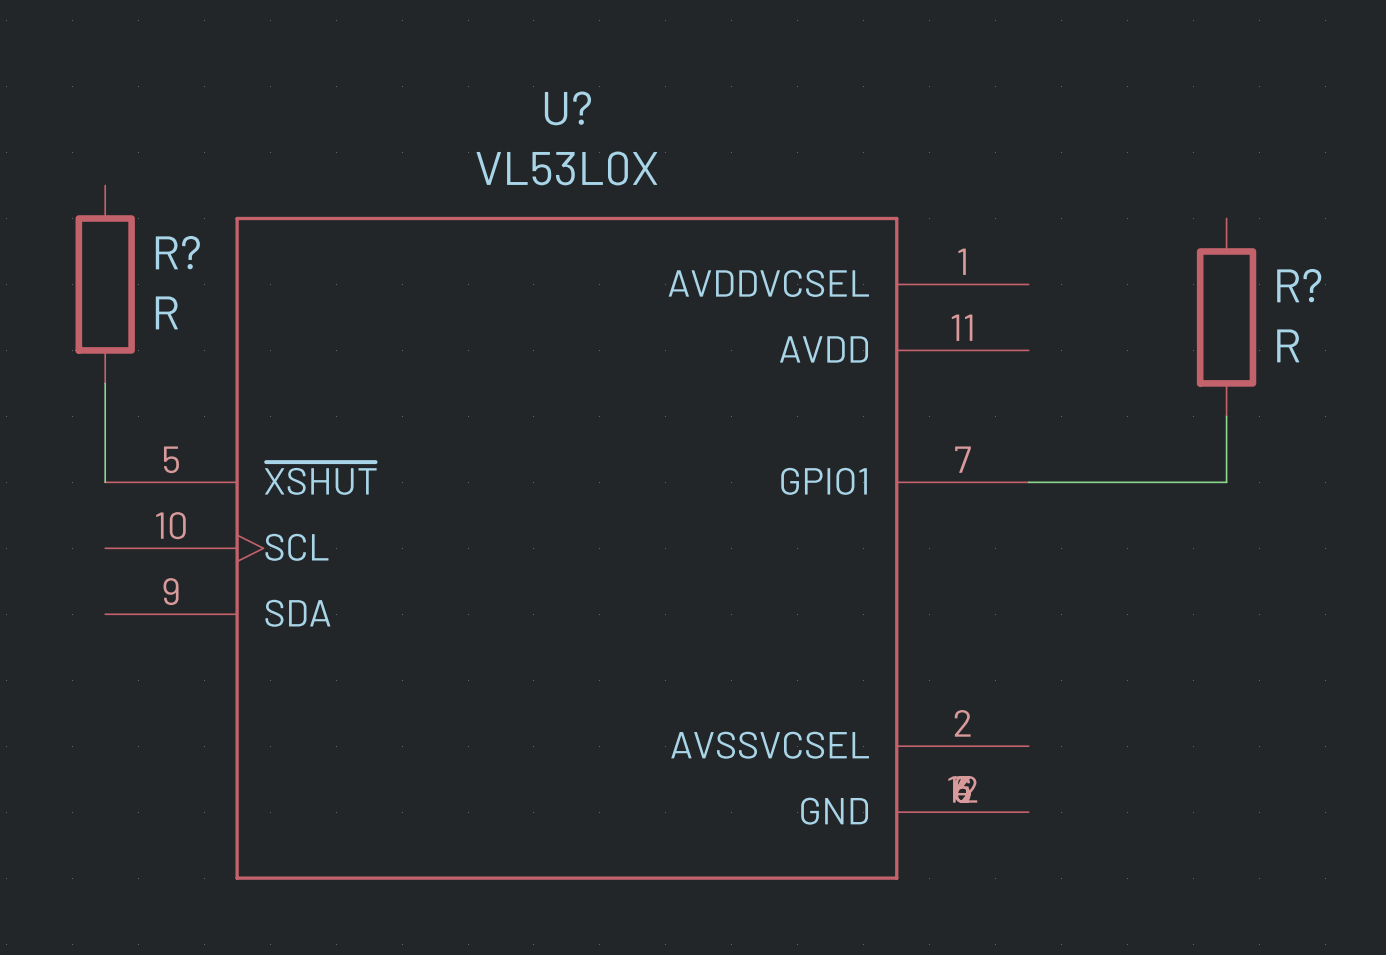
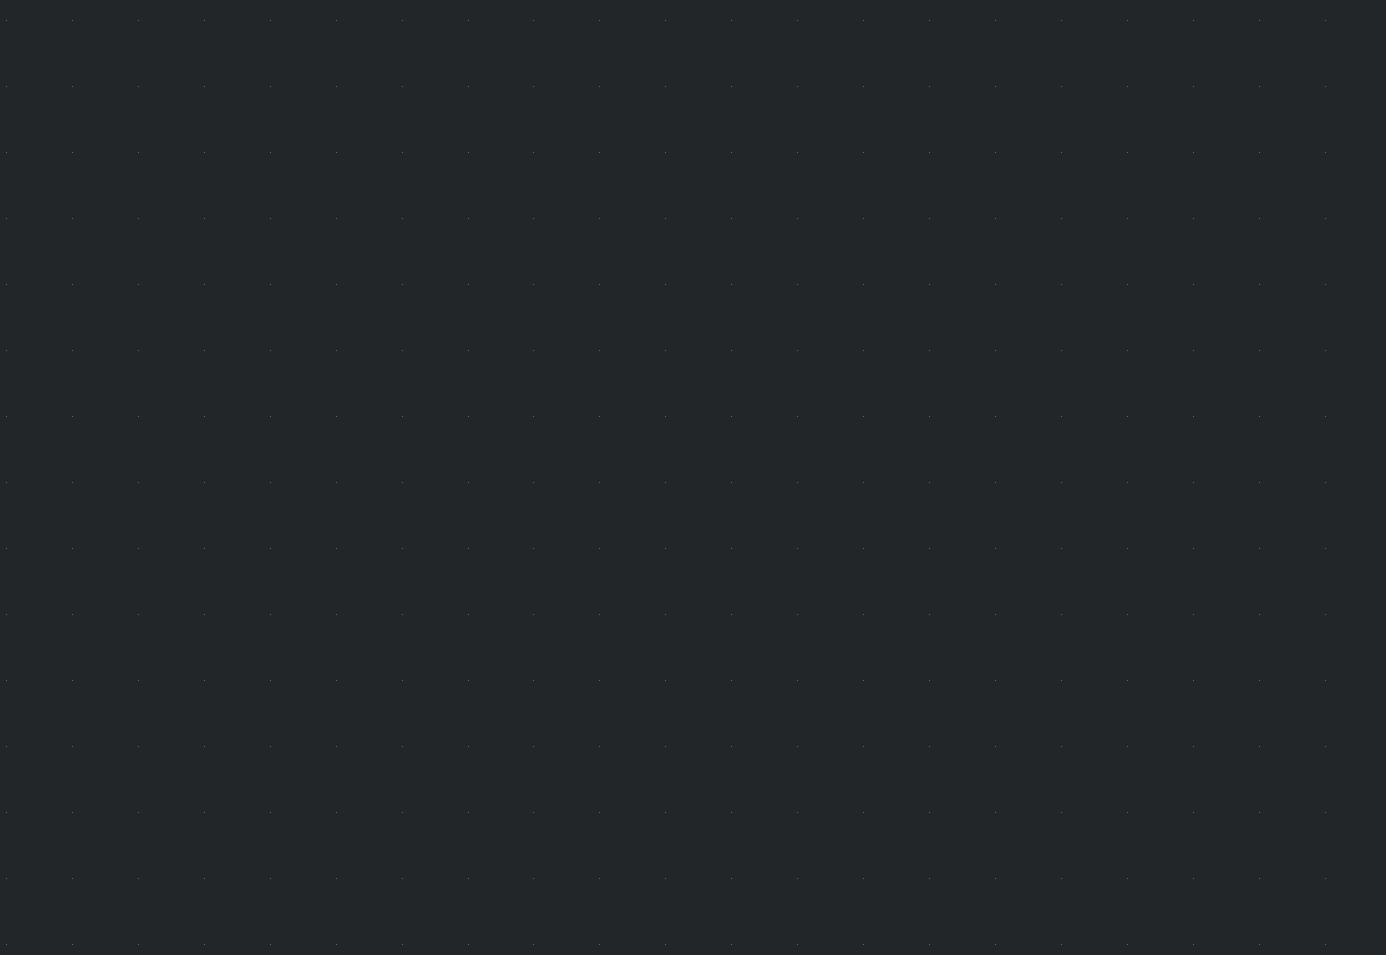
R?: R (105, 284) -> none
R?: R (1226, 317) -> none
wire: (105, 383) (105, 482) -> none
wire: (1226, 416) (1226, 482) (1028, 482) -> none
U?: VL53L0X (566, 548) -> none

